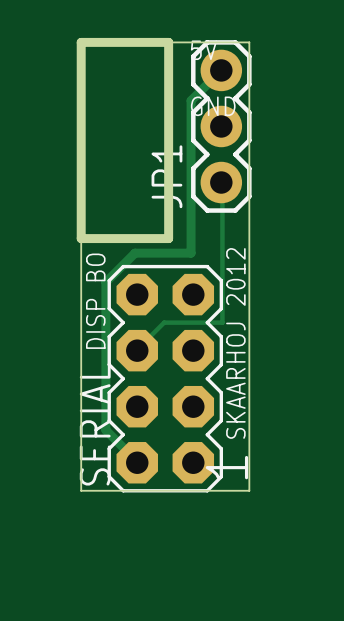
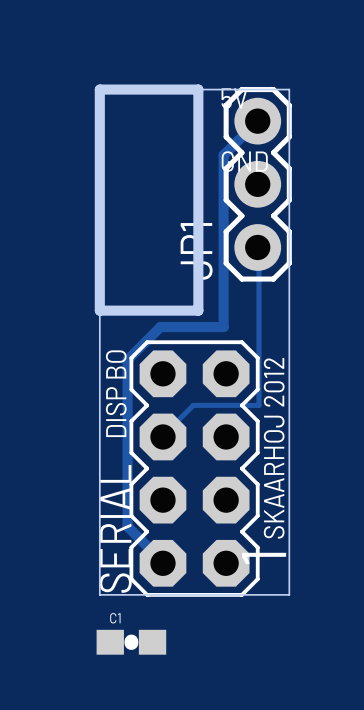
C1: none -> (131, 642)

